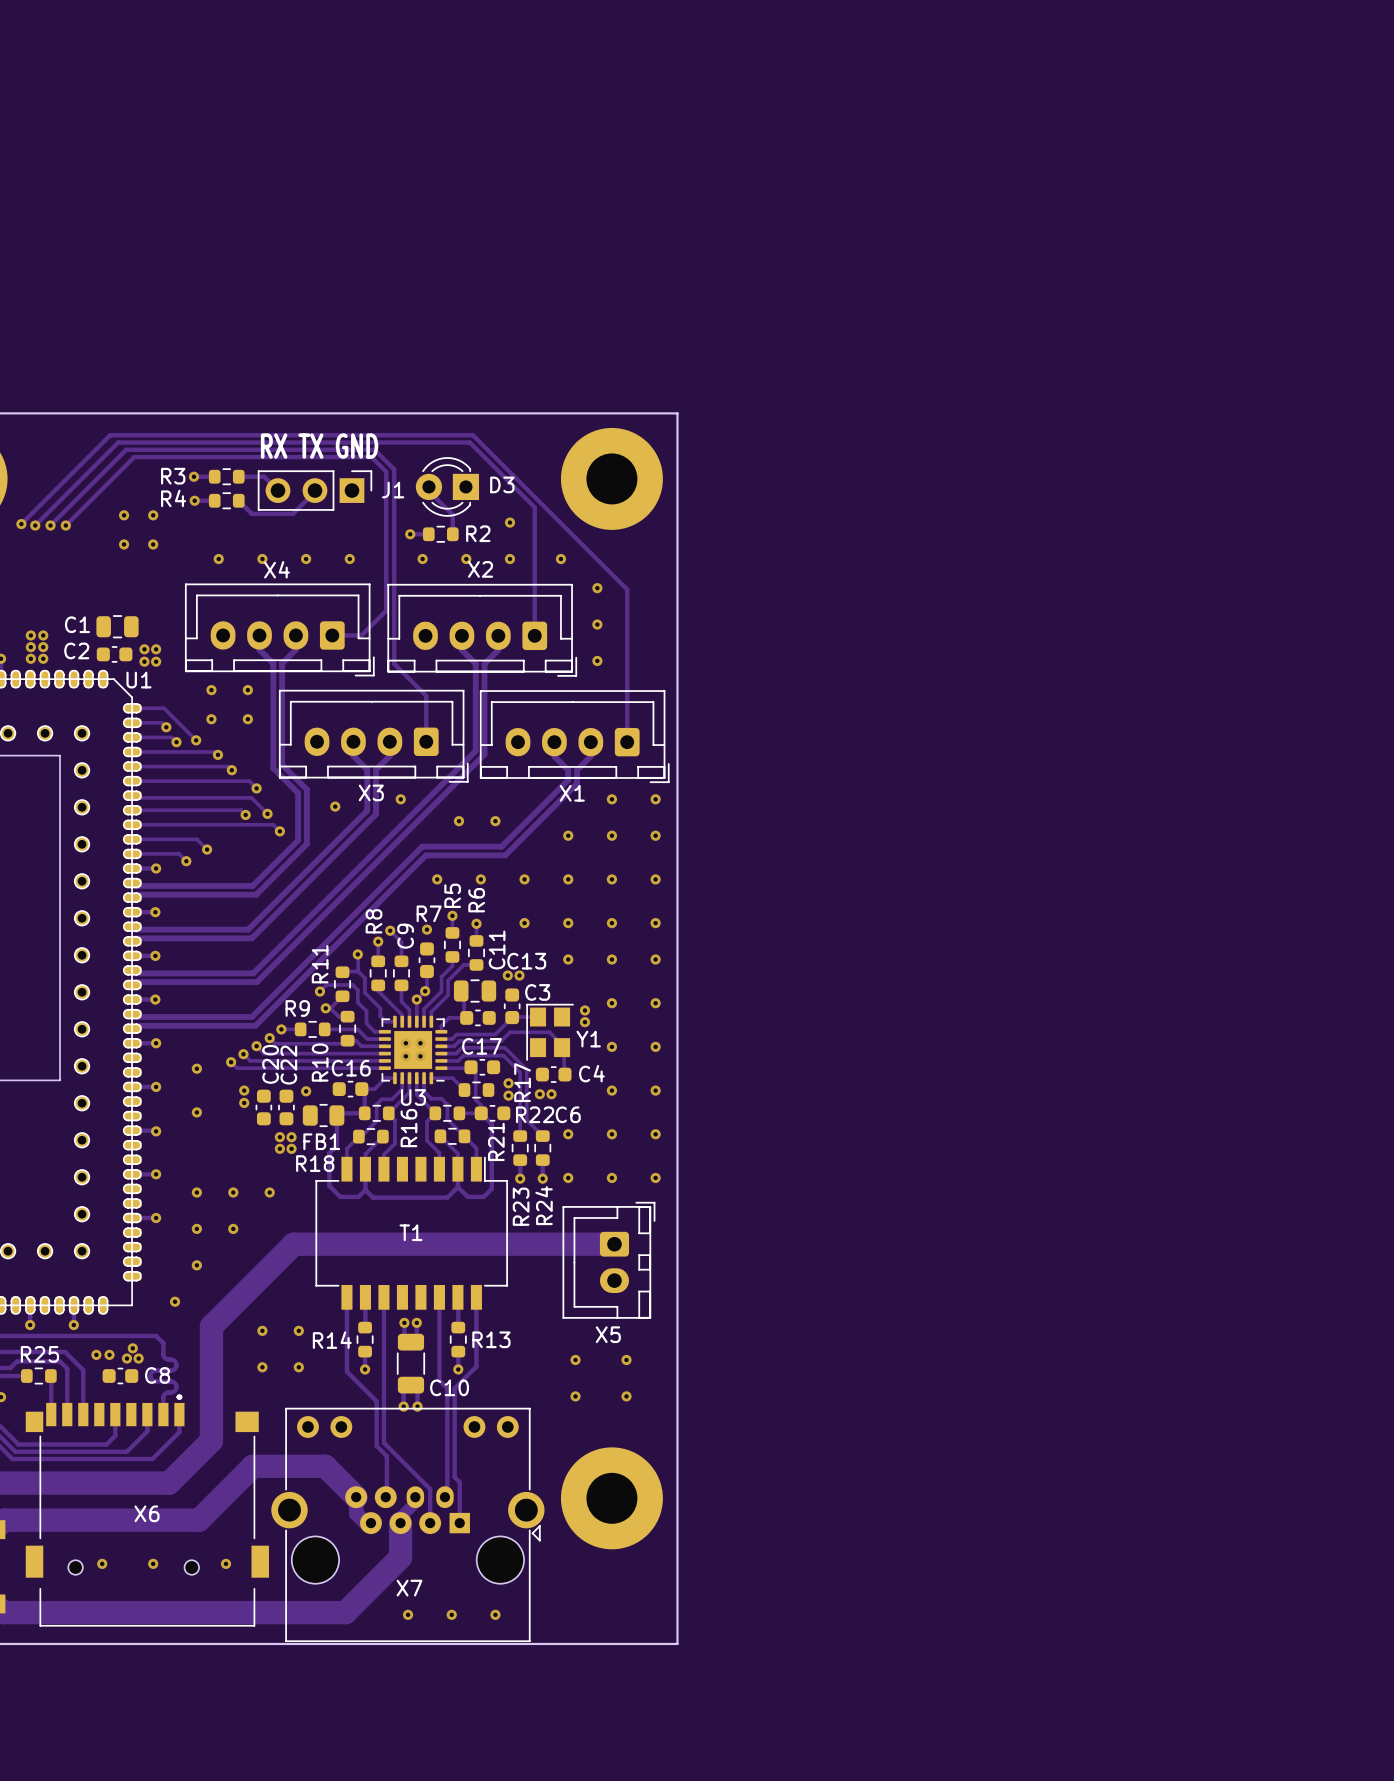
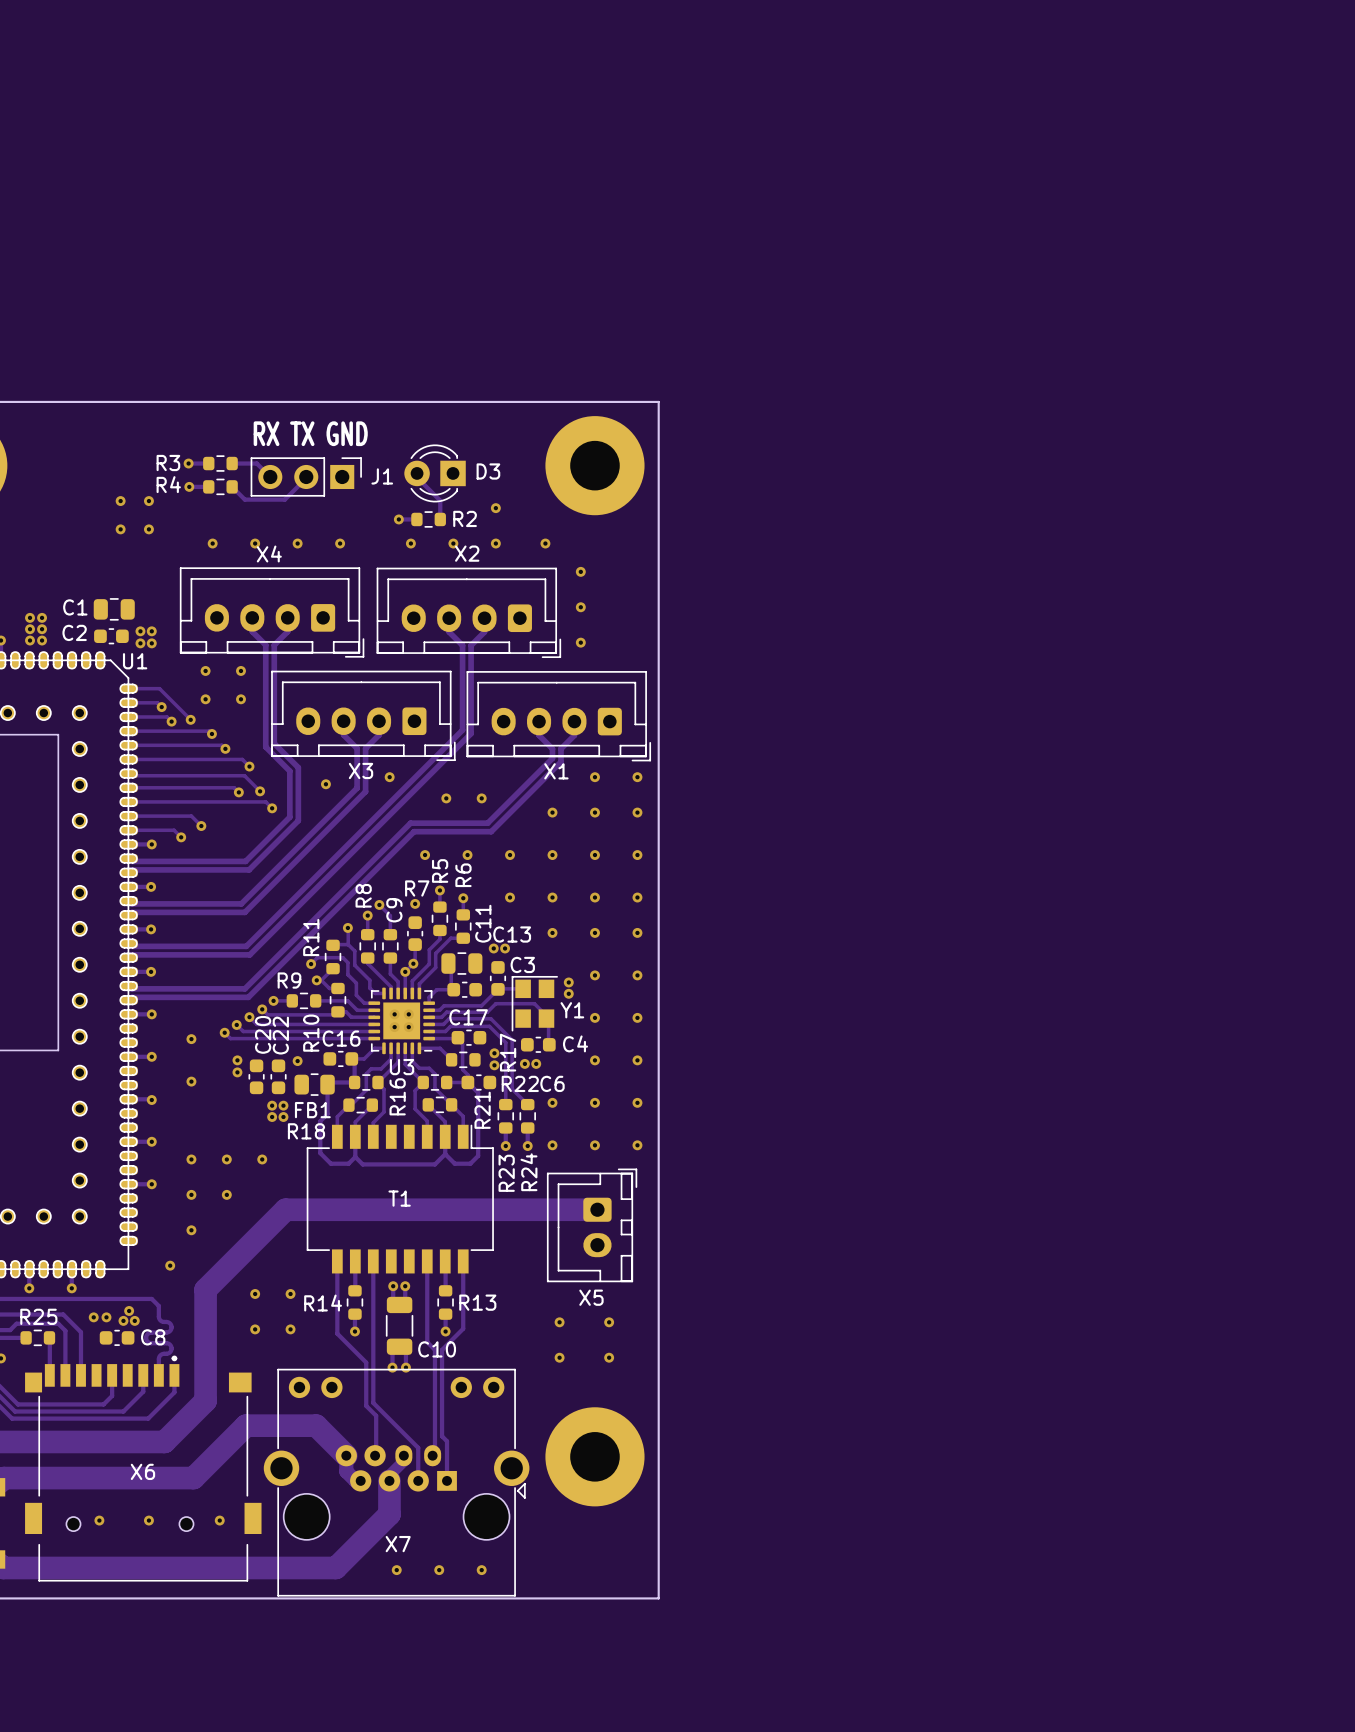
track: (21, 524) (110, 435) (472, 435) (627, 589) (627, 742) -> none
via: (21, 524) -> none
track: (35, 525) (118, 442) (469, 442) (534, 507) (534, 635) -> none
via: (35, 525) -> none
track: (50, 525) (126, 449) (374, 449) (394, 469) (394, 663) (426, 695) (426, 741) -> none
via: (50, 525) -> none
track: (65, 525) (134, 457) (371, 457) (386, 471) (386, 610) (361, 635) (332, 635) -> none
via: (65, 525) -> none

